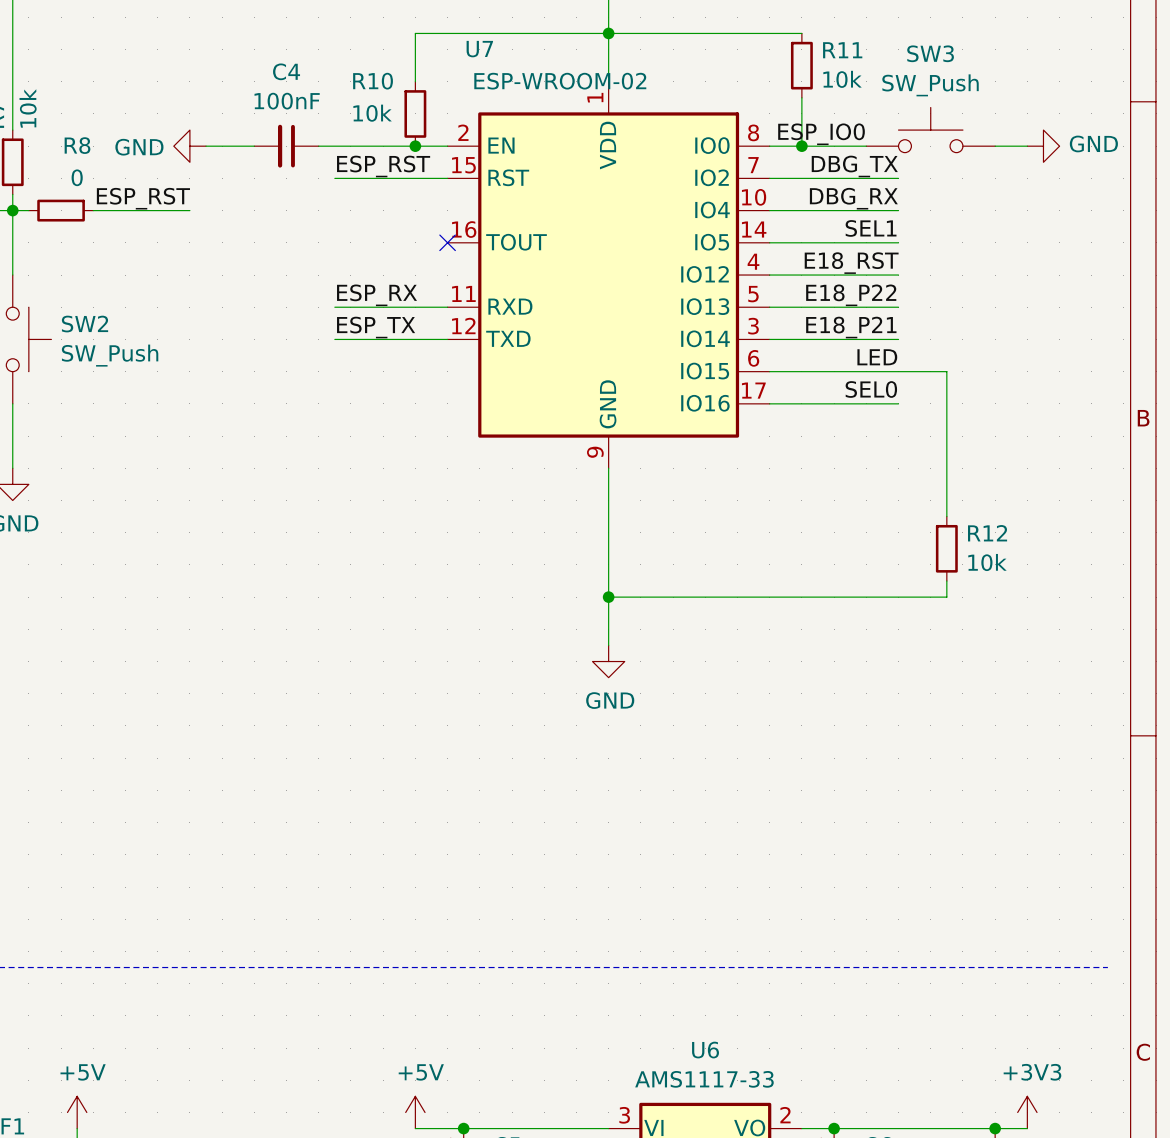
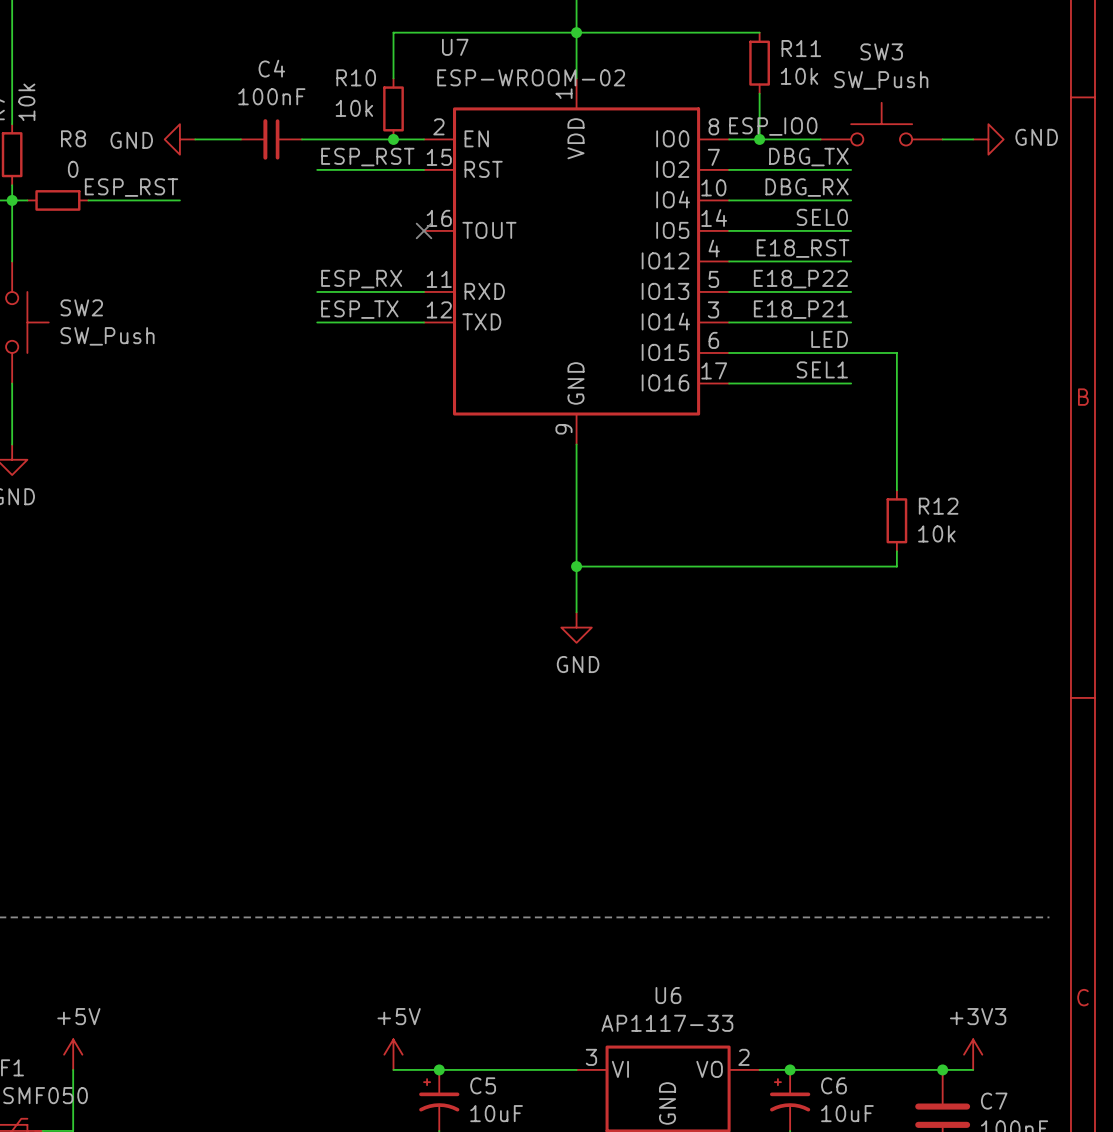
label: SEL1 (871, 228) -> SEL0 (822, 217)
label: SEL0 (871, 389) -> SEL1 (822, 369)
U6 value: AMS1117-33 (704, 1079) -> AP1117-33 (667, 1023)

